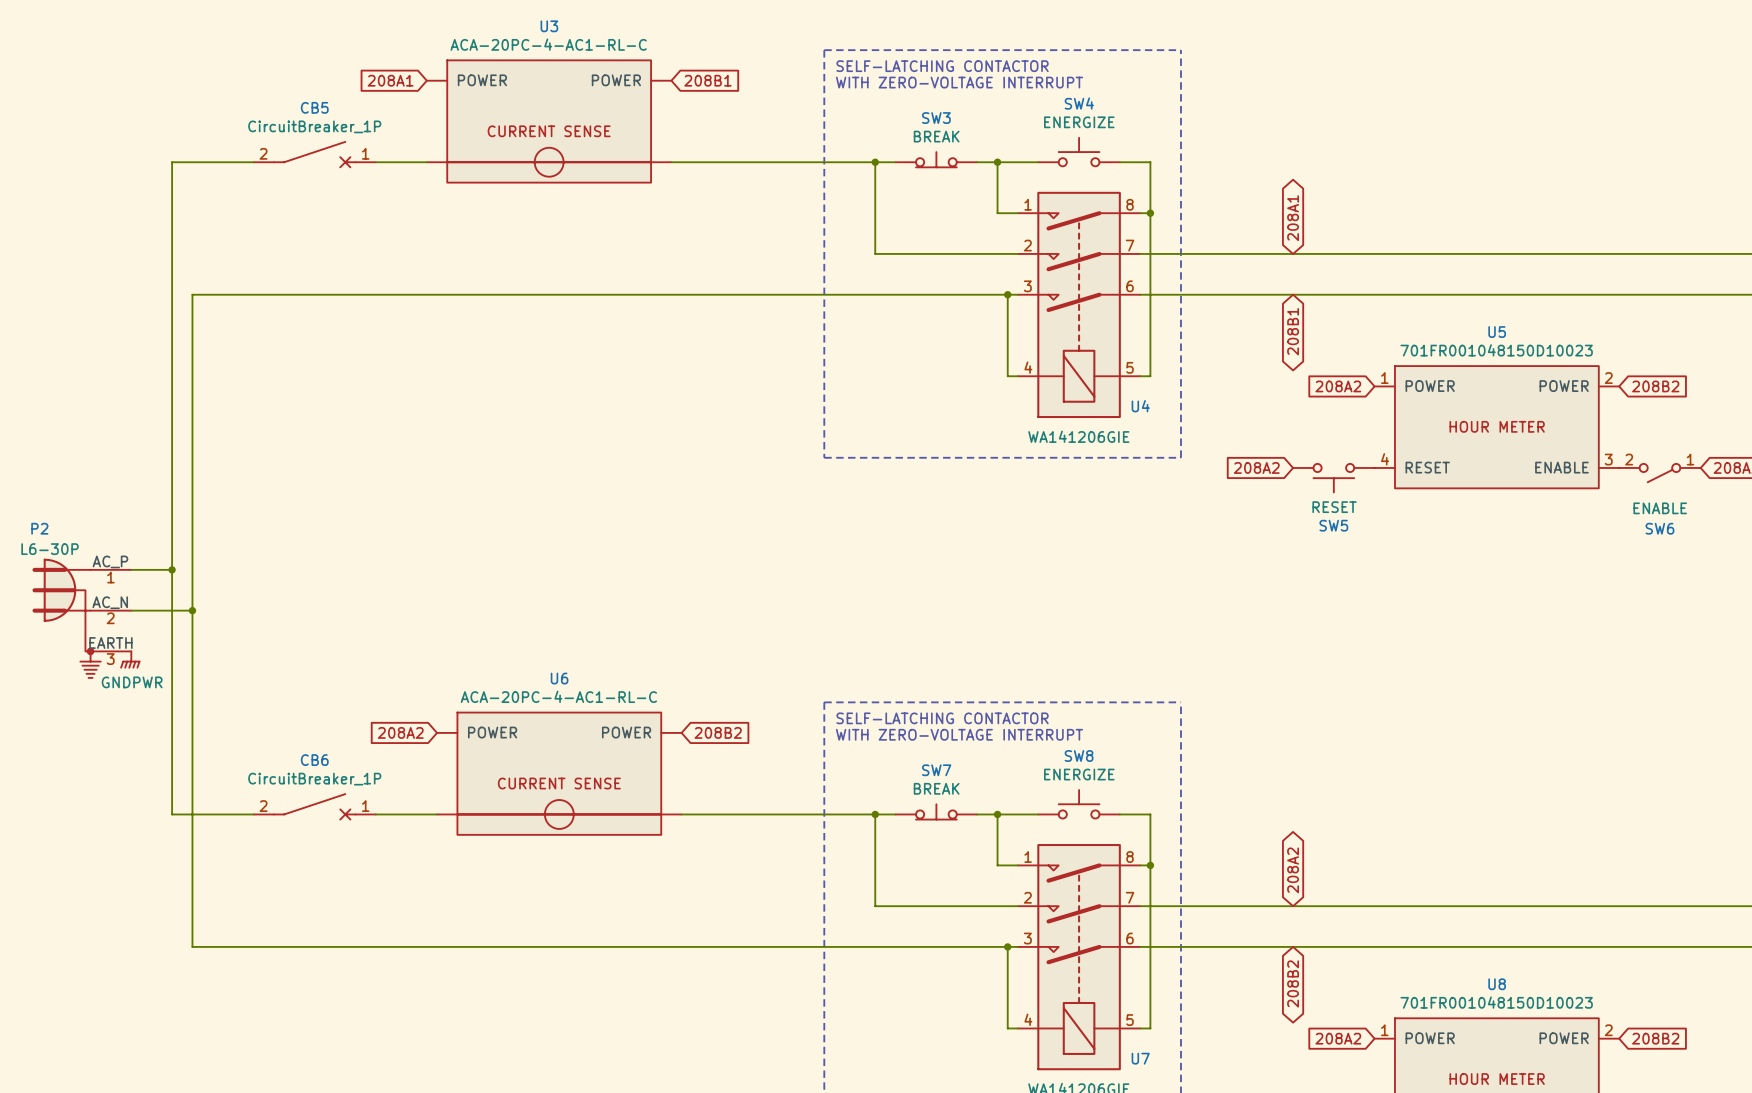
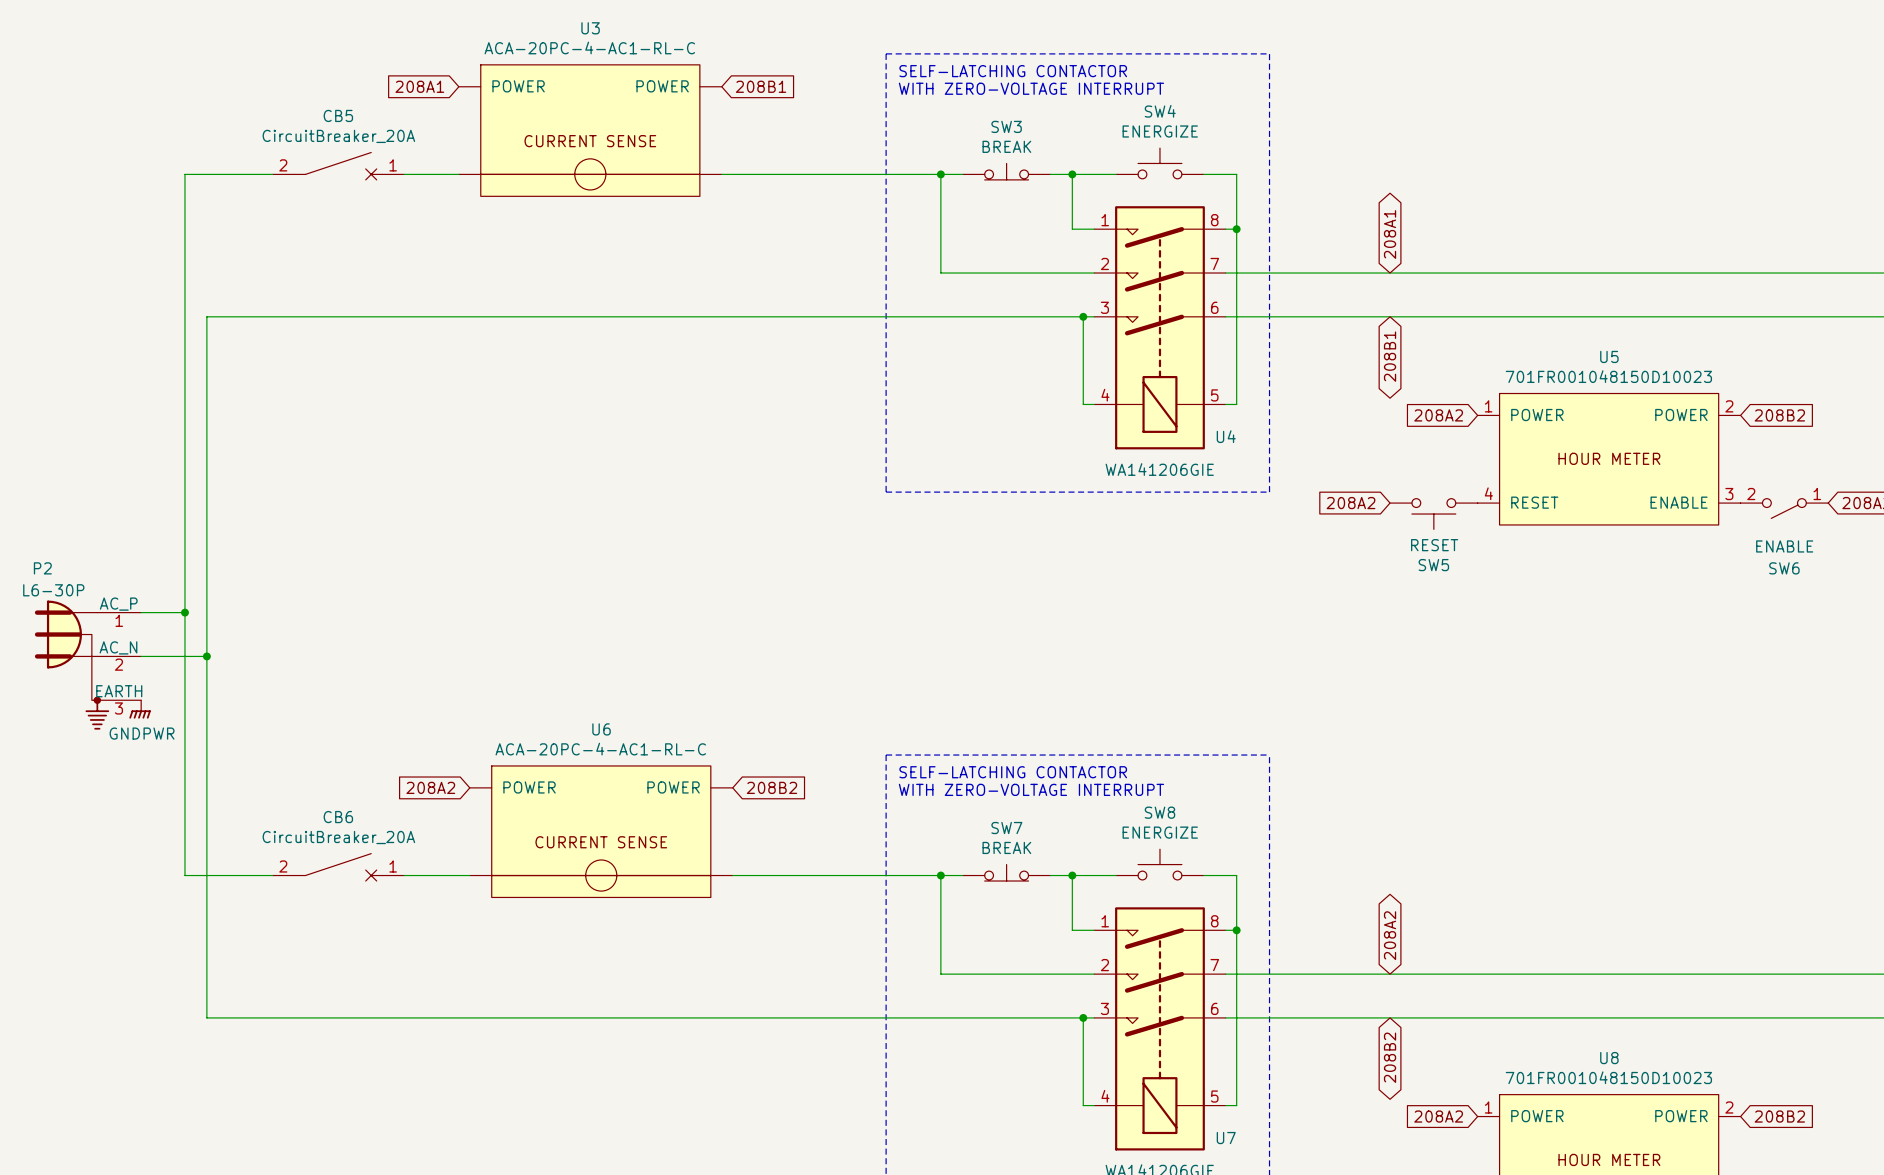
CB5 value: CircuitBreaker_1P (314, 126) -> CircuitBreaker_20A (338, 136)
CB6 value: CircuitBreaker_1P (314, 779) -> CircuitBreaker_20A (338, 837)

